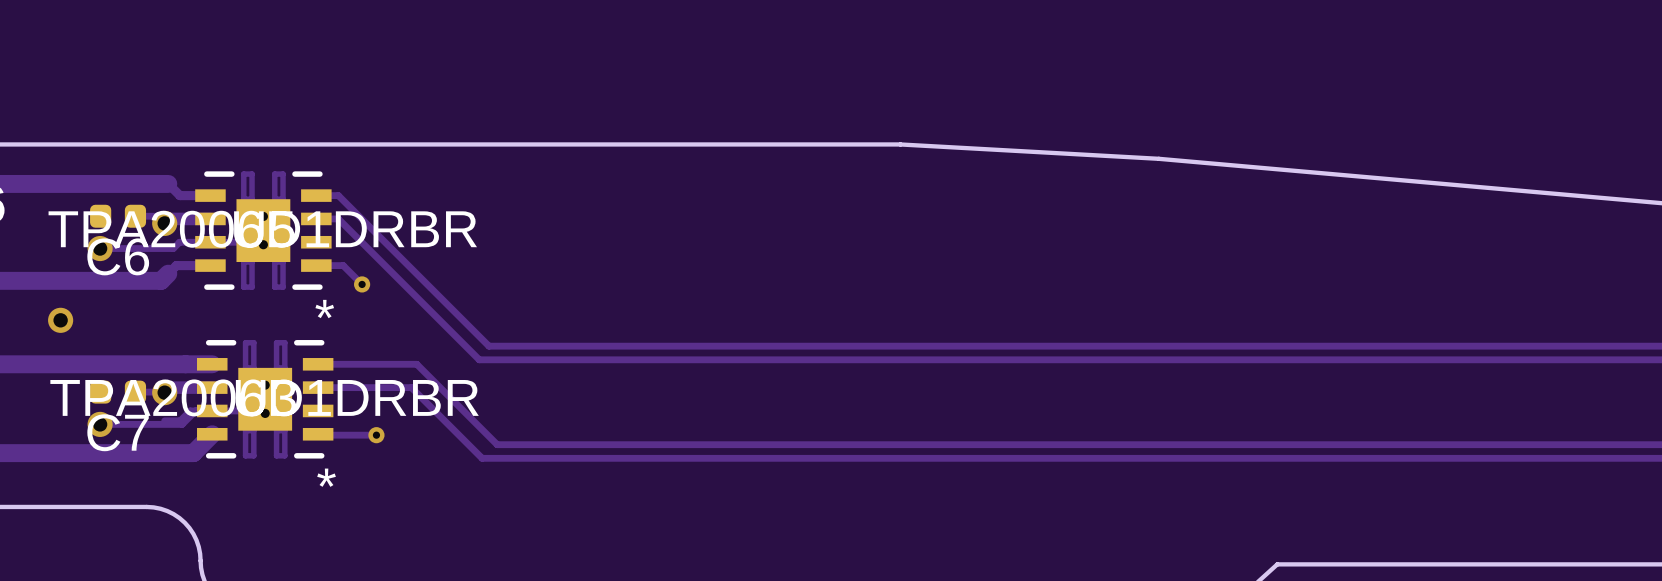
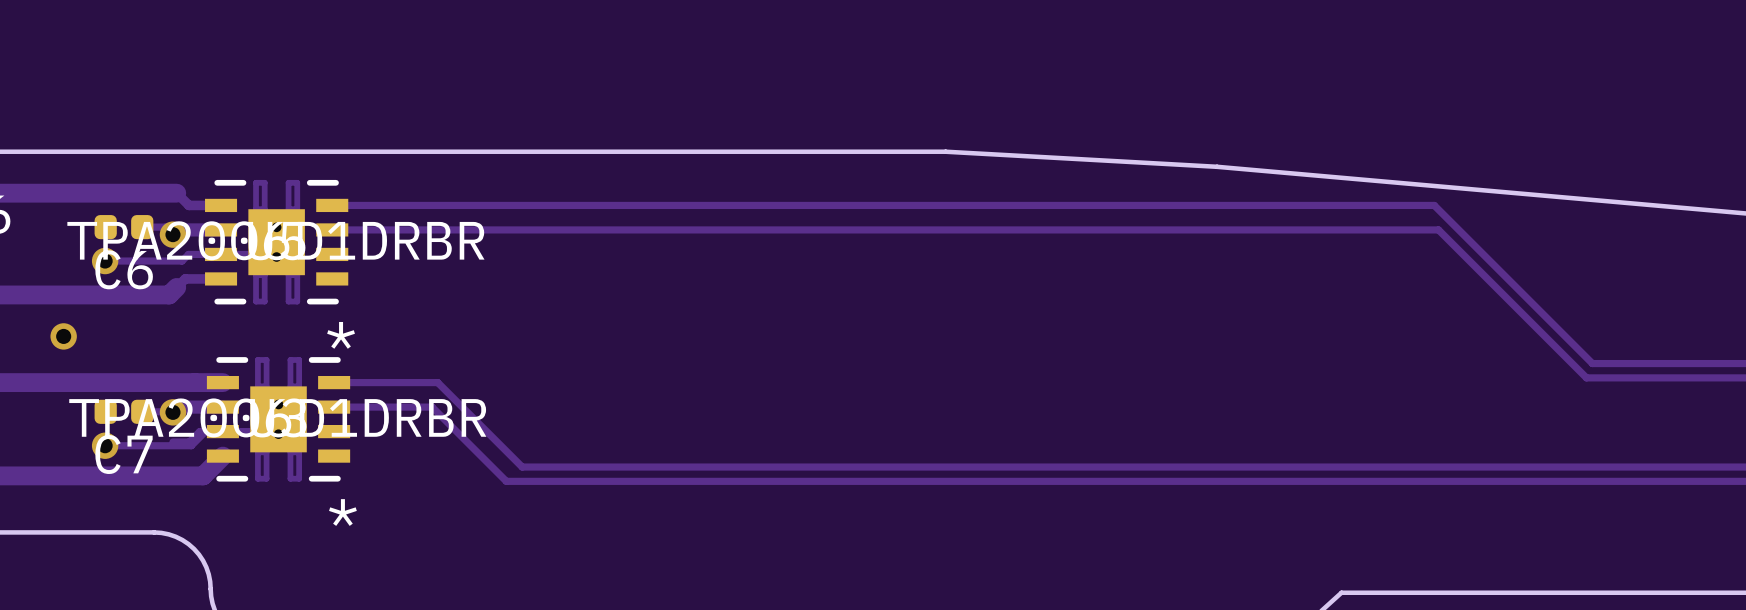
track: (338, 195) (488, 346) (1516, 346) -> (355, 205) (1434, 205) (1592, 363)
track: (338, 218) (479, 359) (1510, 359) -> (355, 229) (1438, 229) (1586, 377)
track: (316, 265) (343, 265) (362, 284) -> none
via: (362, 284) -> none
track: (318, 434) (376, 435) -> none
via: (376, 435) -> none

